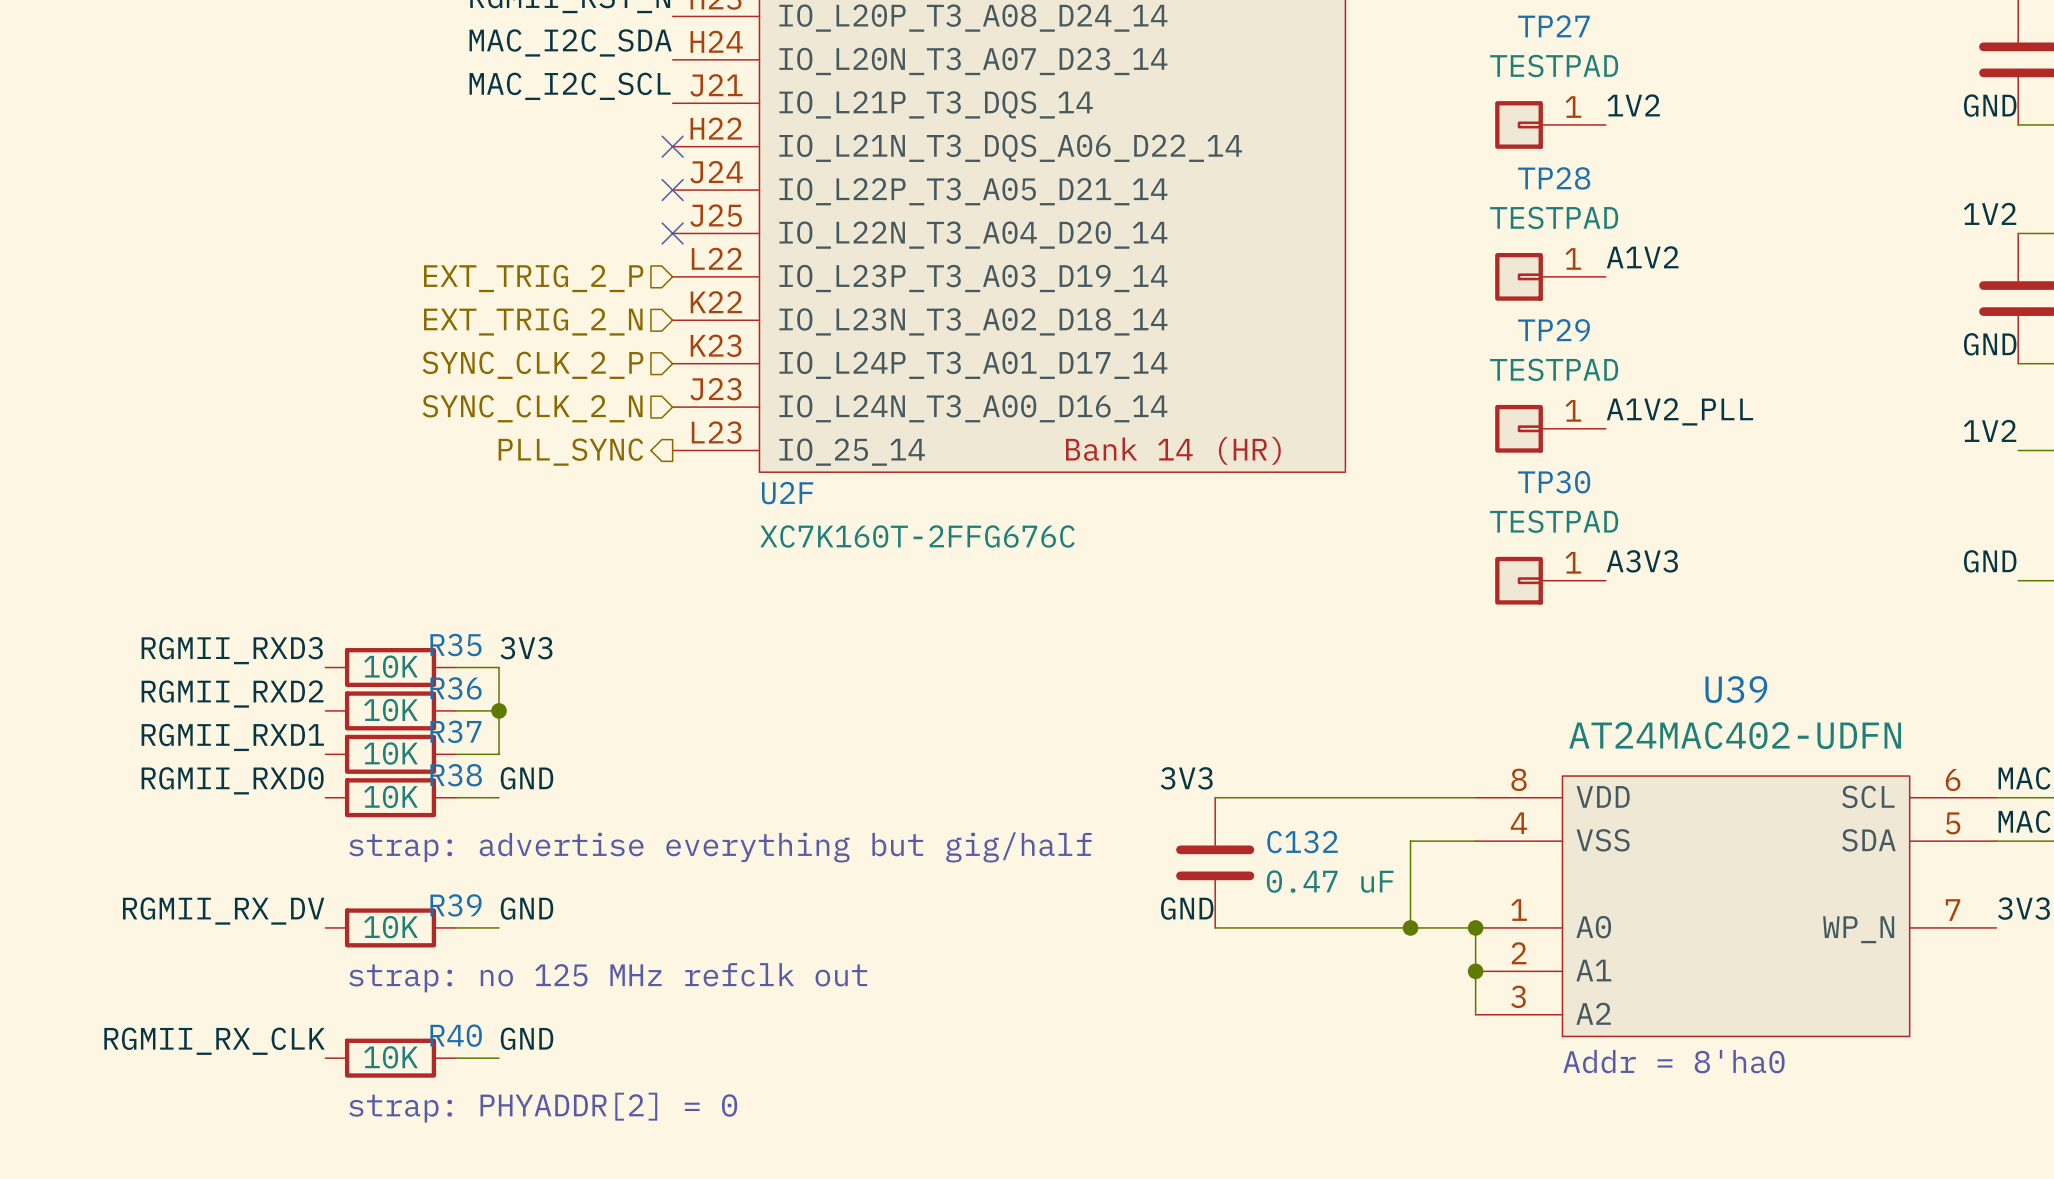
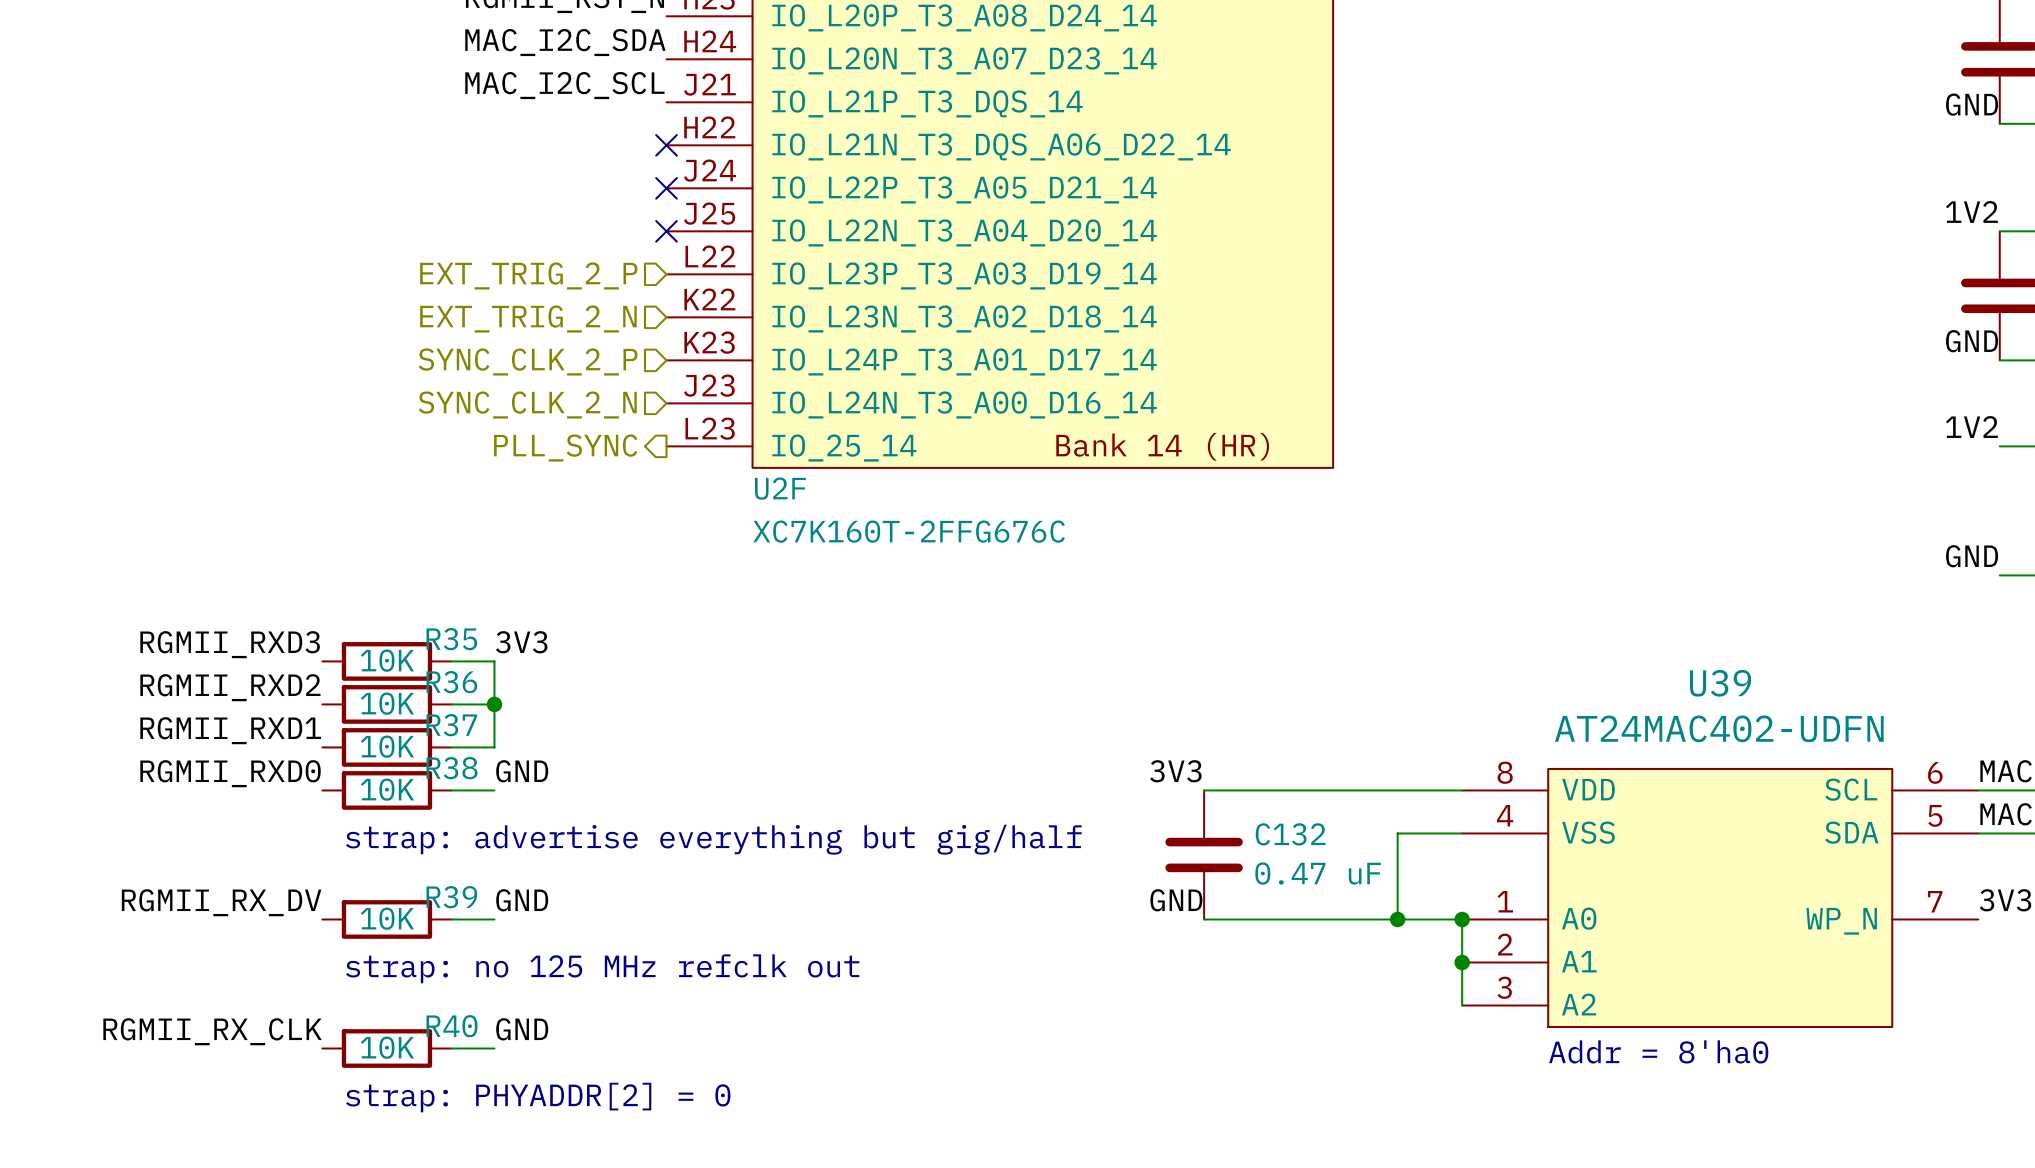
label: 1V2 (1633, 105) -> none
TP27: TESTPAD (1550, 124) -> none
label: A1V2 (1642, 257) -> none
TP28: TESTPAD (1550, 276) -> none
label: A1V2_PLL (1679, 411) -> none
TP29: TESTPAD (1550, 428) -> none
label: A3V3 (1642, 561) -> none
TP30: TESTPAD (1550, 580) -> none

